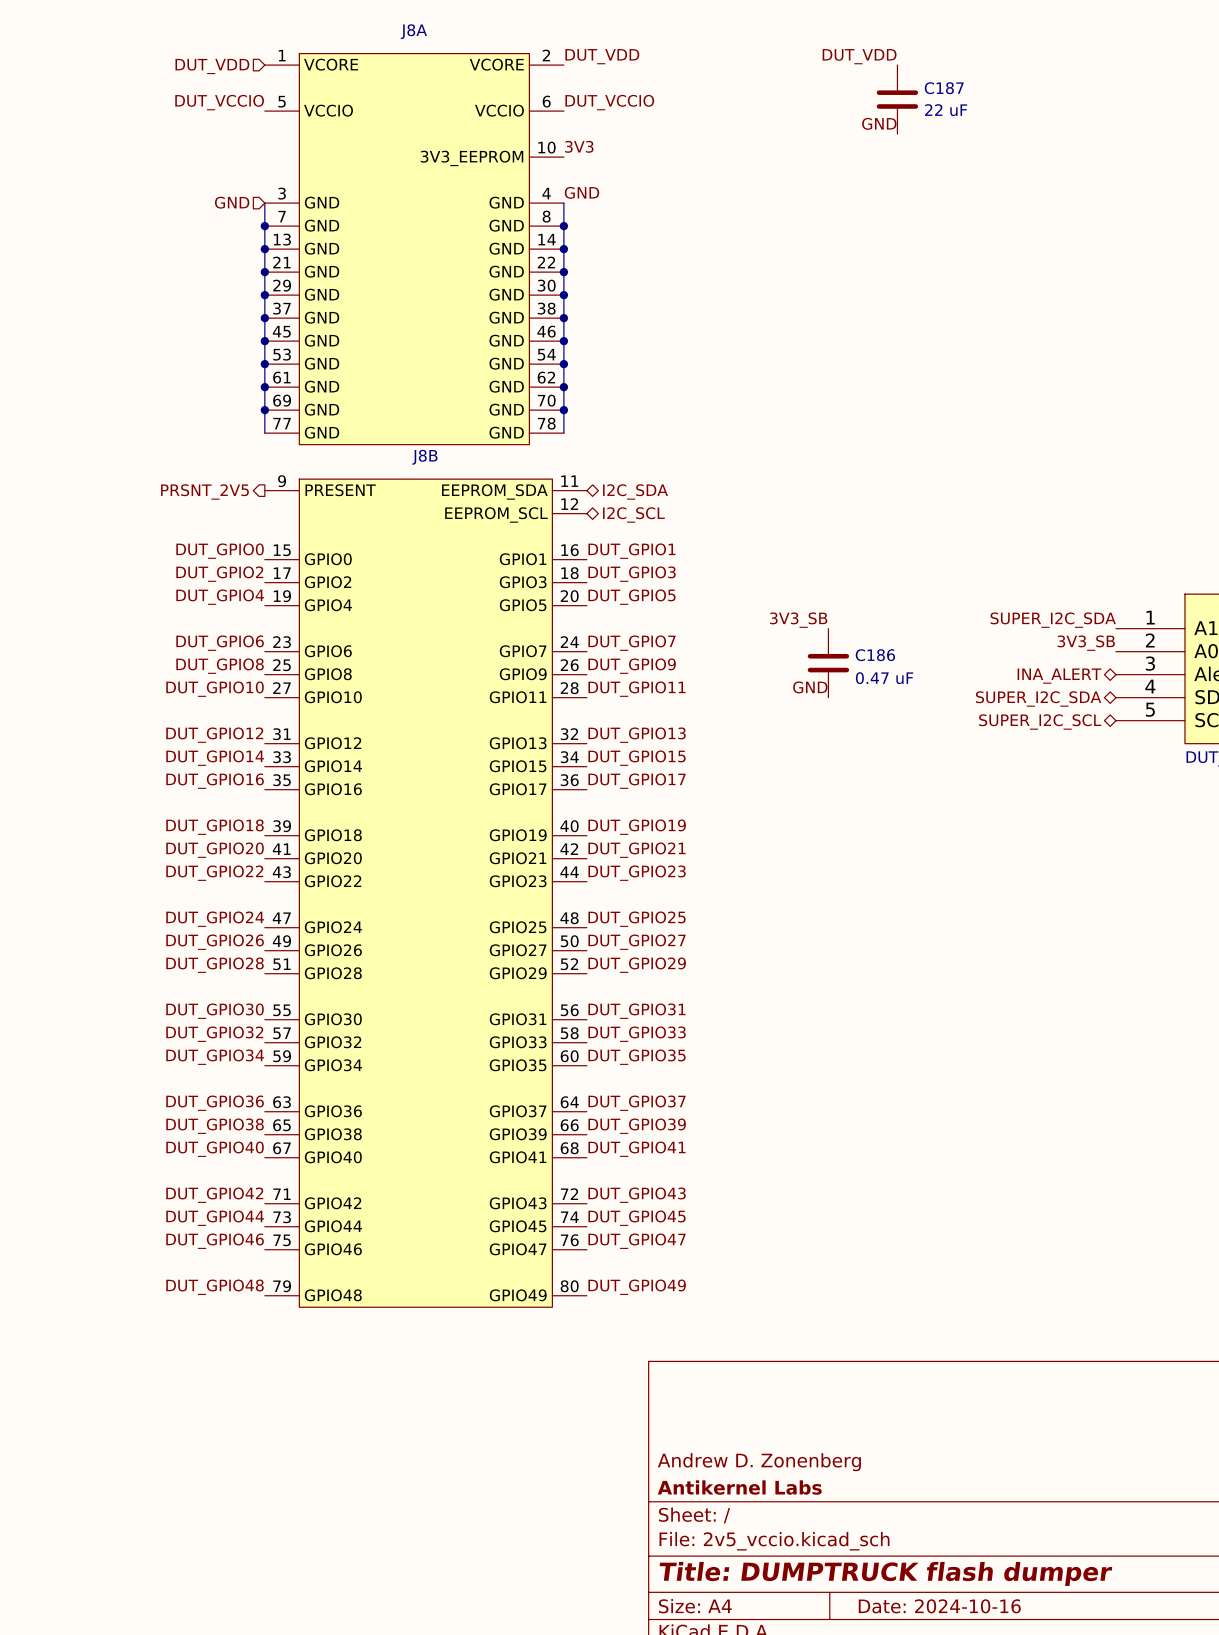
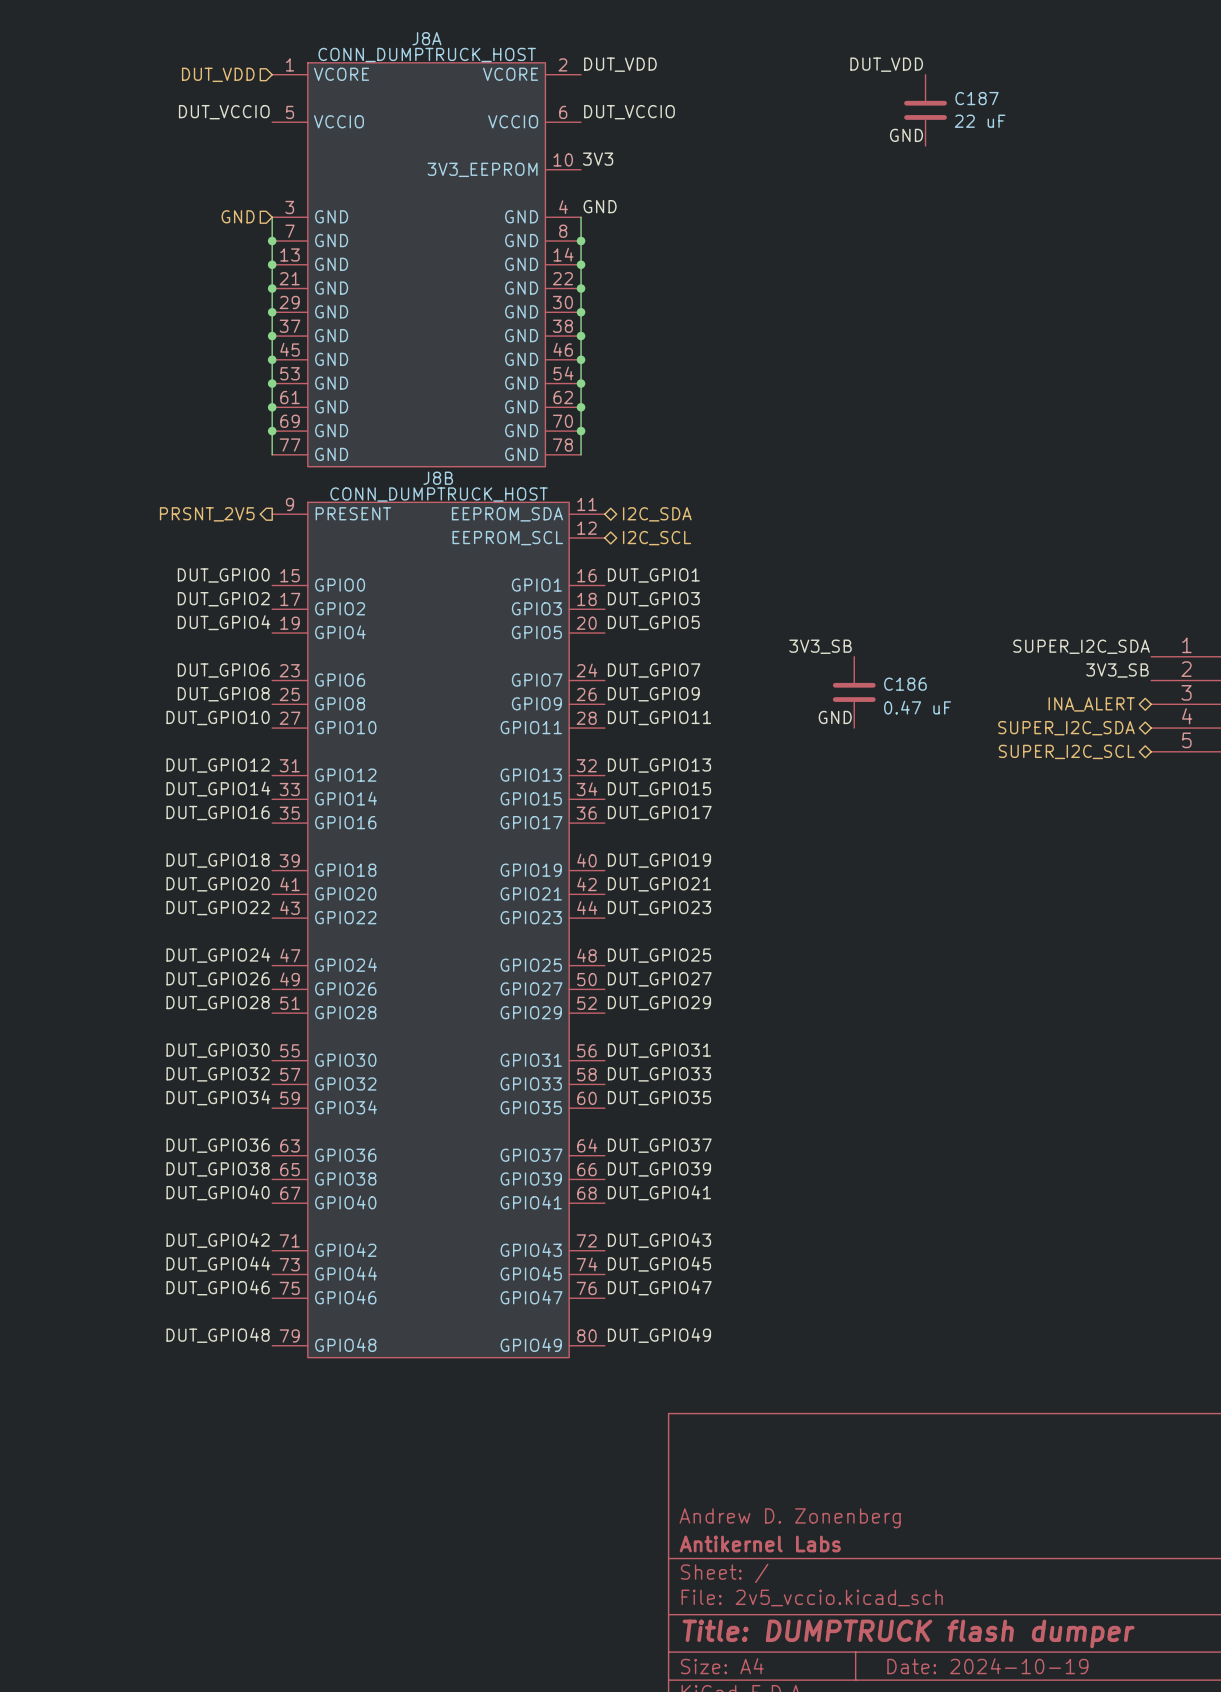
J8A value: none -> CONN_DUMPTRUCK_HOST (427, 55)
J8B value: none -> CONN_DUMPTRUCK_HOST (439, 494)
title block: Date: 2024-10-16 (939, 1606) -> Date: 2024-10-19 (987, 1666)

